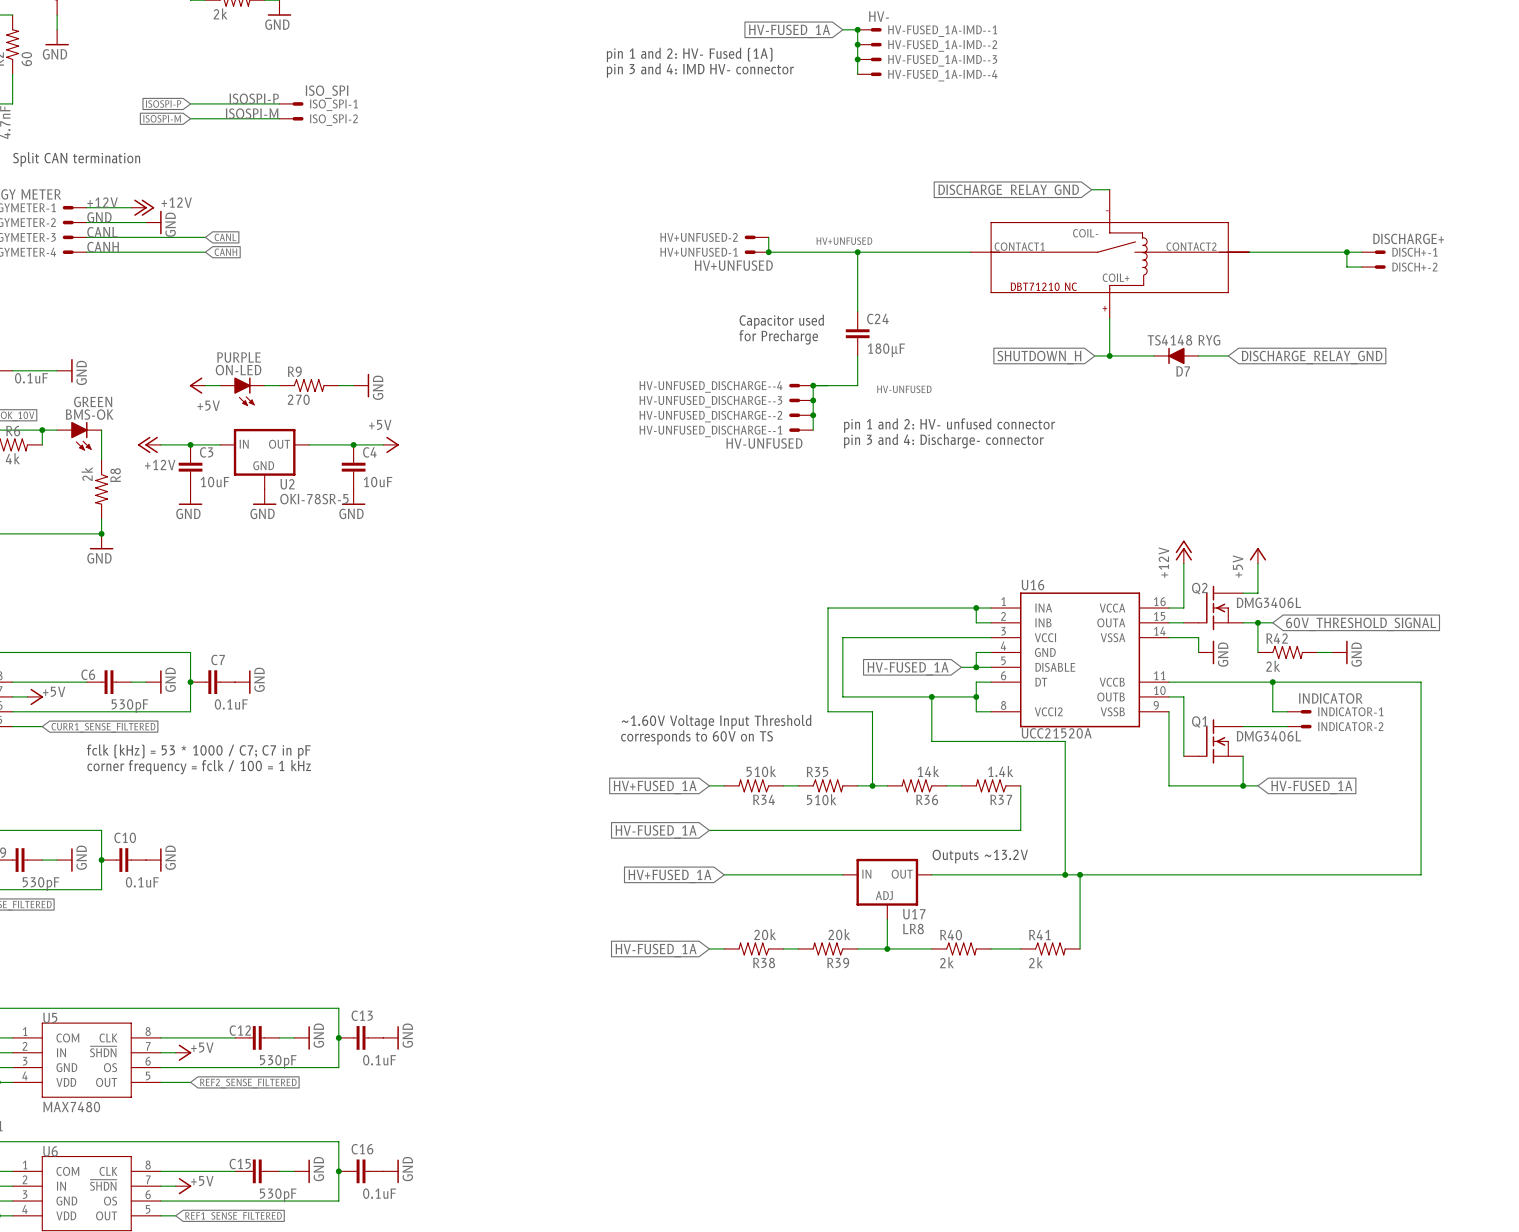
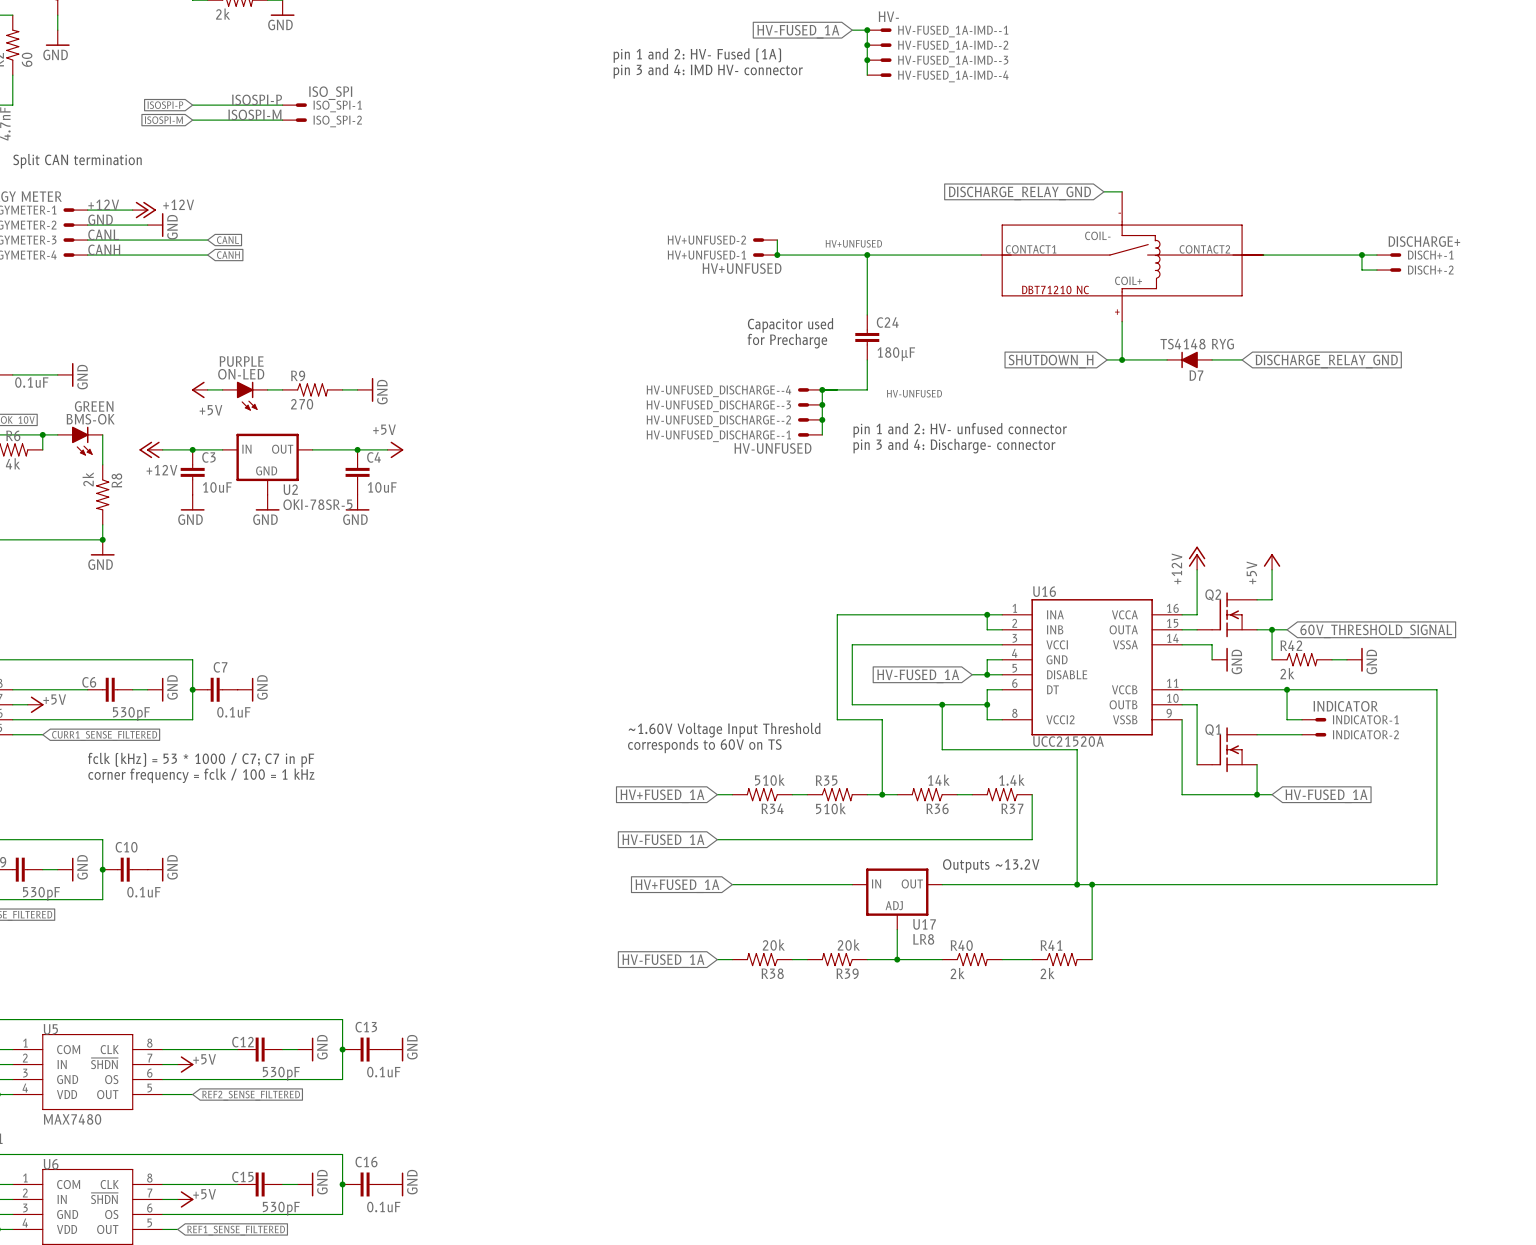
Q2 value: DMG3406L (1268, 602) -> none
Q1 value: DMG3406L (1268, 736) -> none

